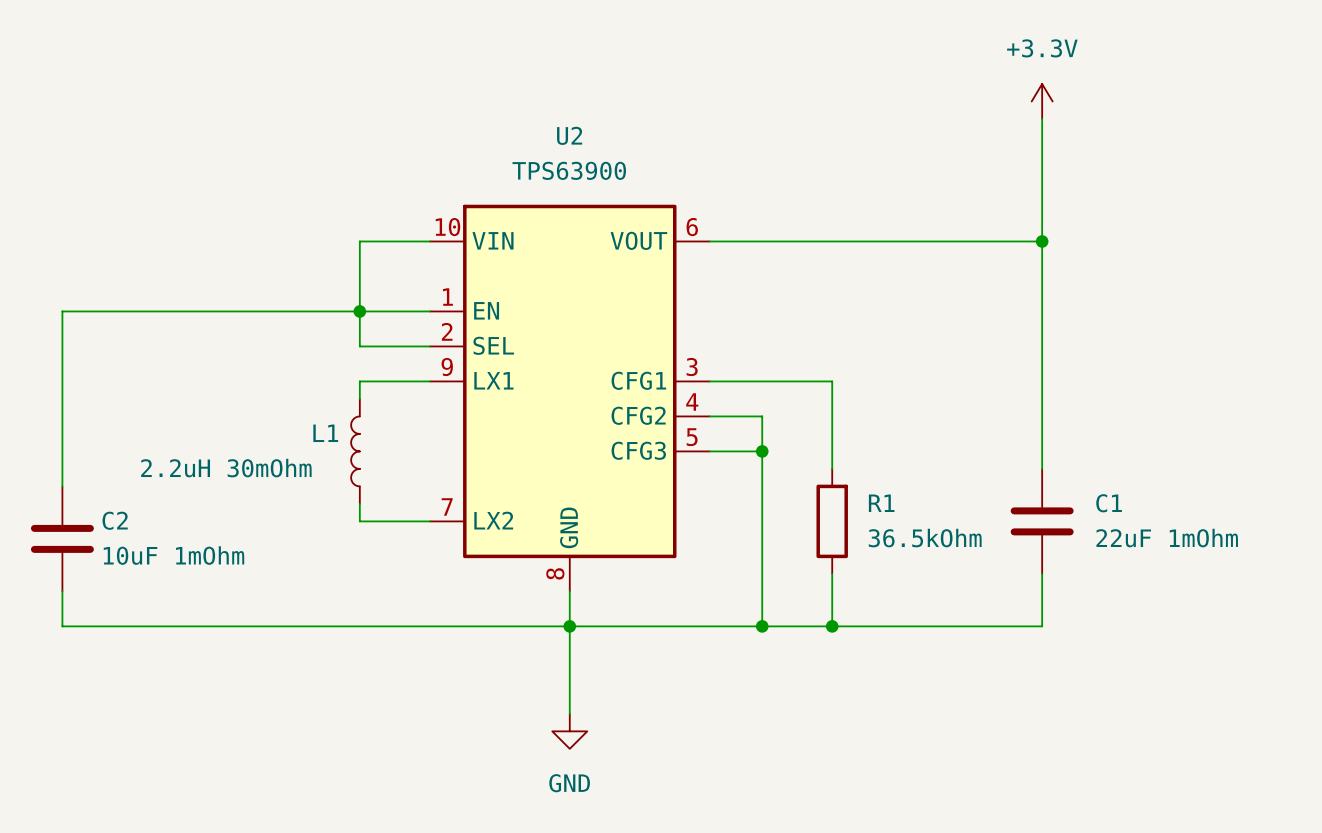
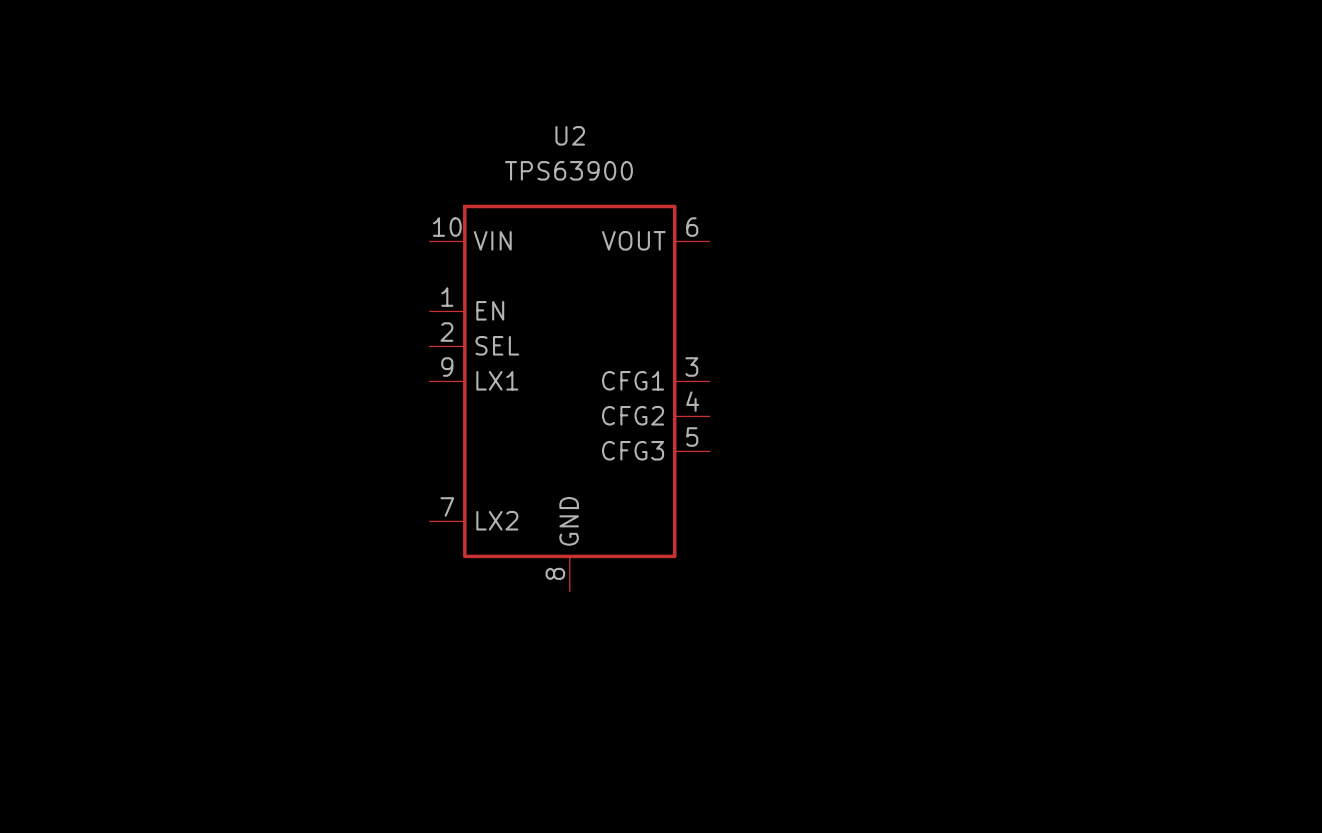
power symbol: +3.3V (1042, 101) -> none
wire: (1042, 119) (1042, 468) -> none
wire: (429, 241) (359, 241) (359, 346) (429, 346) -> none
wire: (709, 241) (1042, 241) -> none
junction: (1042, 241) -> none
junction: (359, 311) -> none
wire: (429, 311) (62, 311) (62, 486) -> none
wire: (429, 381) (359, 381) (359, 398) -> none
wire: (709, 381) (832, 381) (832, 468) -> none
wire: (709, 416) (762, 416) (762, 626) -> none
L1: 2.2uH 30mOhm (355, 451) -> none
wire: (709, 451) (762, 451) -> none
junction: (762, 451) -> none
wire: (359, 503) (359, 521) (429, 521) -> none
R1: 36.5kOhm (832, 521) -> none
C1: 22uF 1mOhm (1042, 521) -> none
C2: 10uF 1mOhm (62, 538) -> none
wire: (832, 573) (832, 626) -> none
wire: (1042, 573) (1042, 626) (62, 626) (62, 591) -> none
wire: (569, 591) (569, 713) -> none
junction: (569, 626) -> none
junction: (762, 626) -> none
junction: (832, 626) -> none
power symbol: GND (569, 731) -> none

